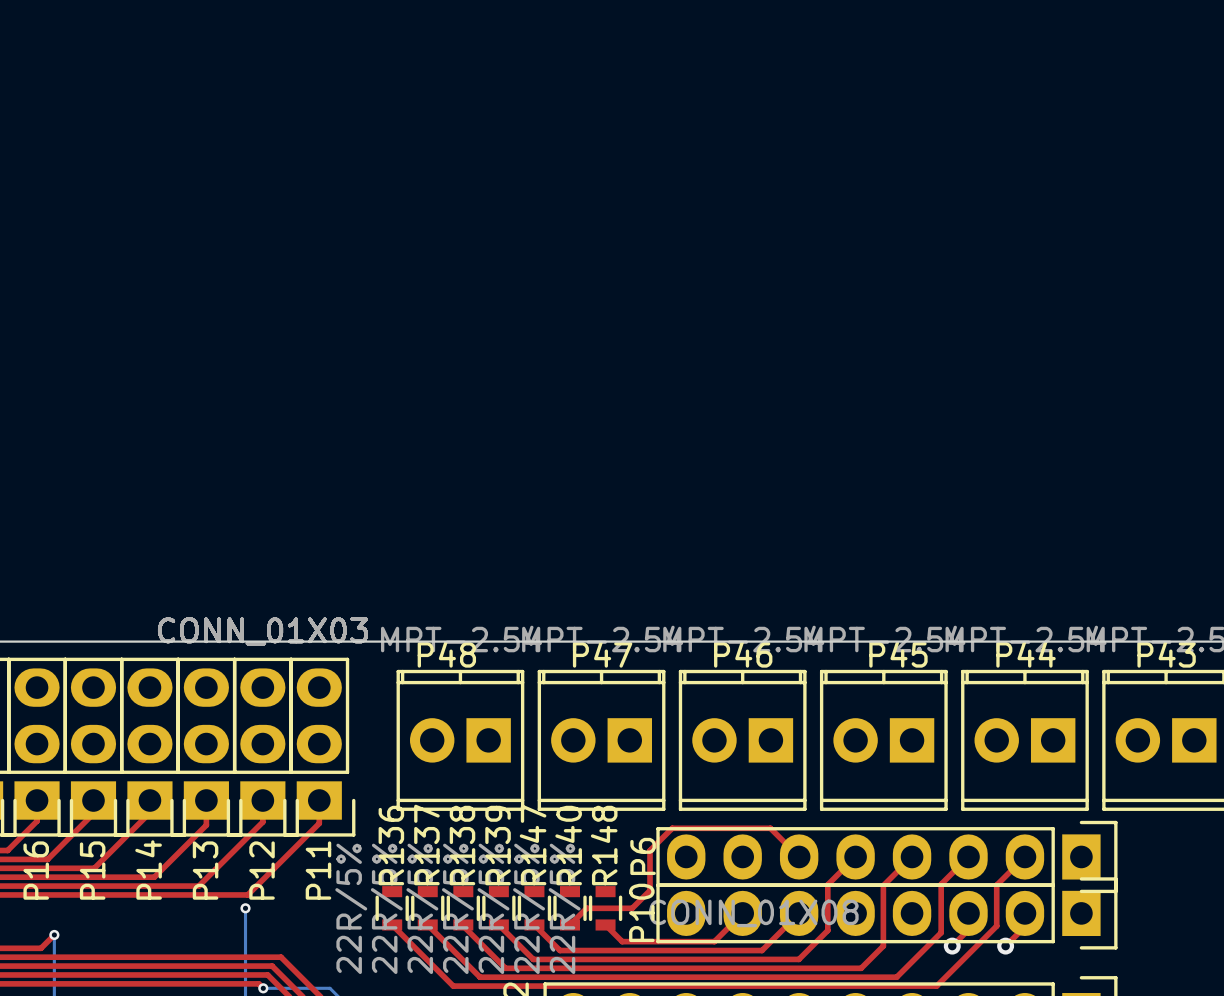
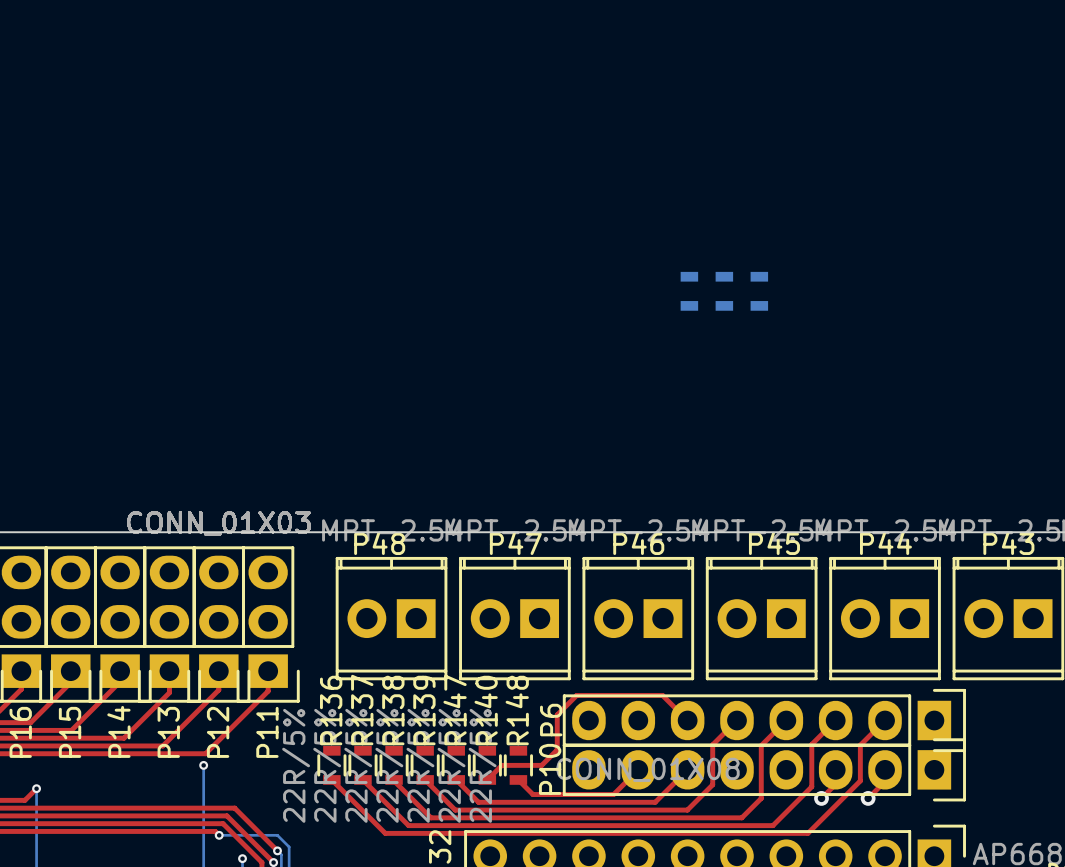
part: none -> (689, 291)
part: none -> (724, 291)
part: none -> (759, 291)

